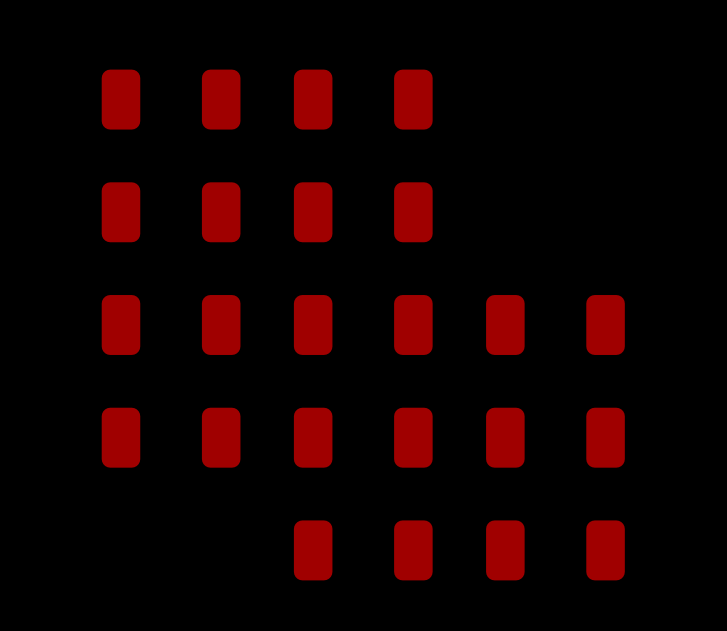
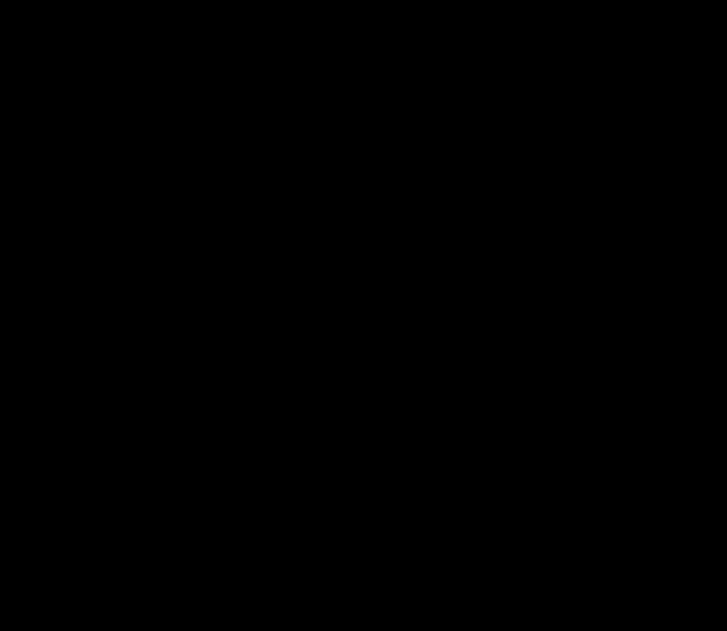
part: (171, 99) -> none
part: (363, 99) -> none
part: (171, 212) -> none
part: (363, 212) -> none
part: (171, 324) -> none
part: (363, 324) -> none
part: (555, 324) -> none
part: (171, 437) -> none
part: (363, 437) -> none
part: (555, 437) -> none
part: (363, 550) -> none
part: (555, 550) -> none

